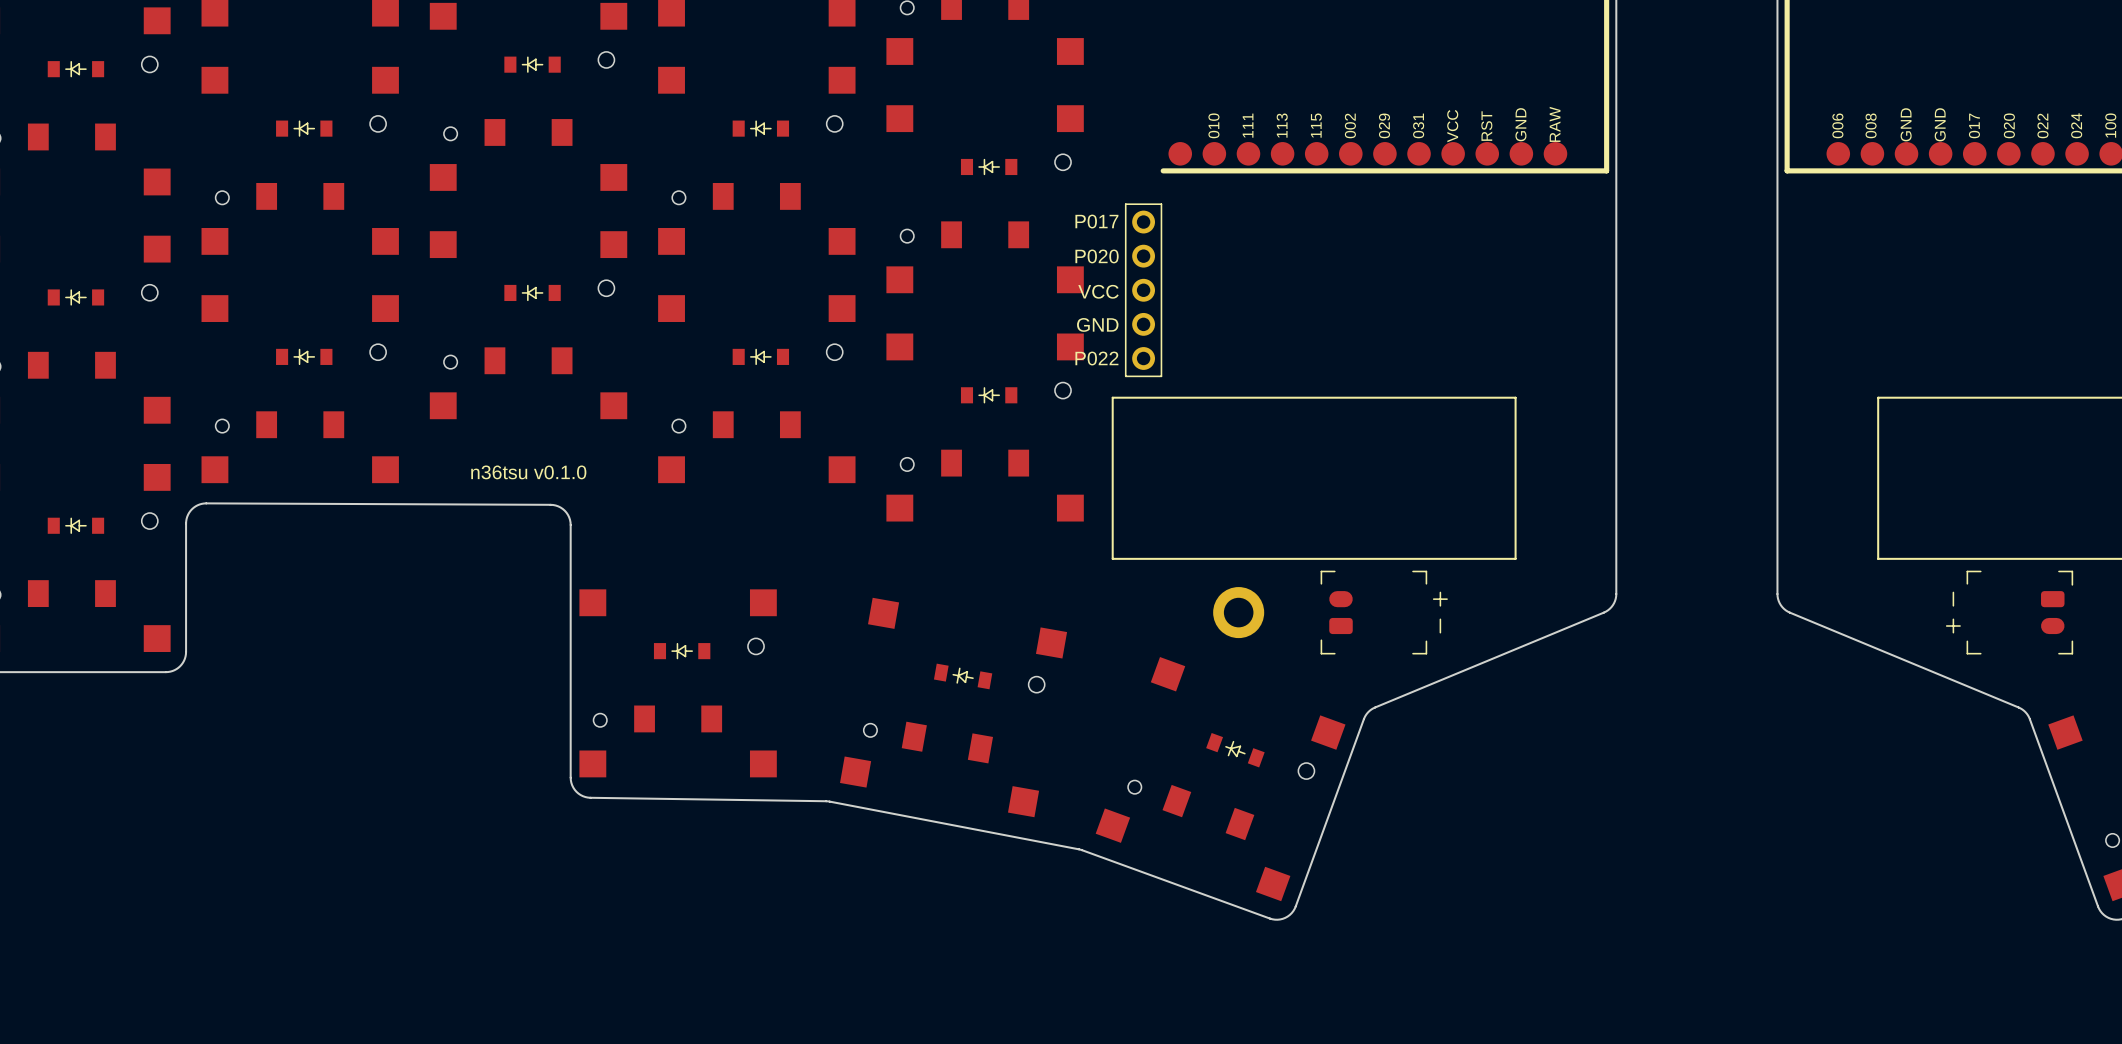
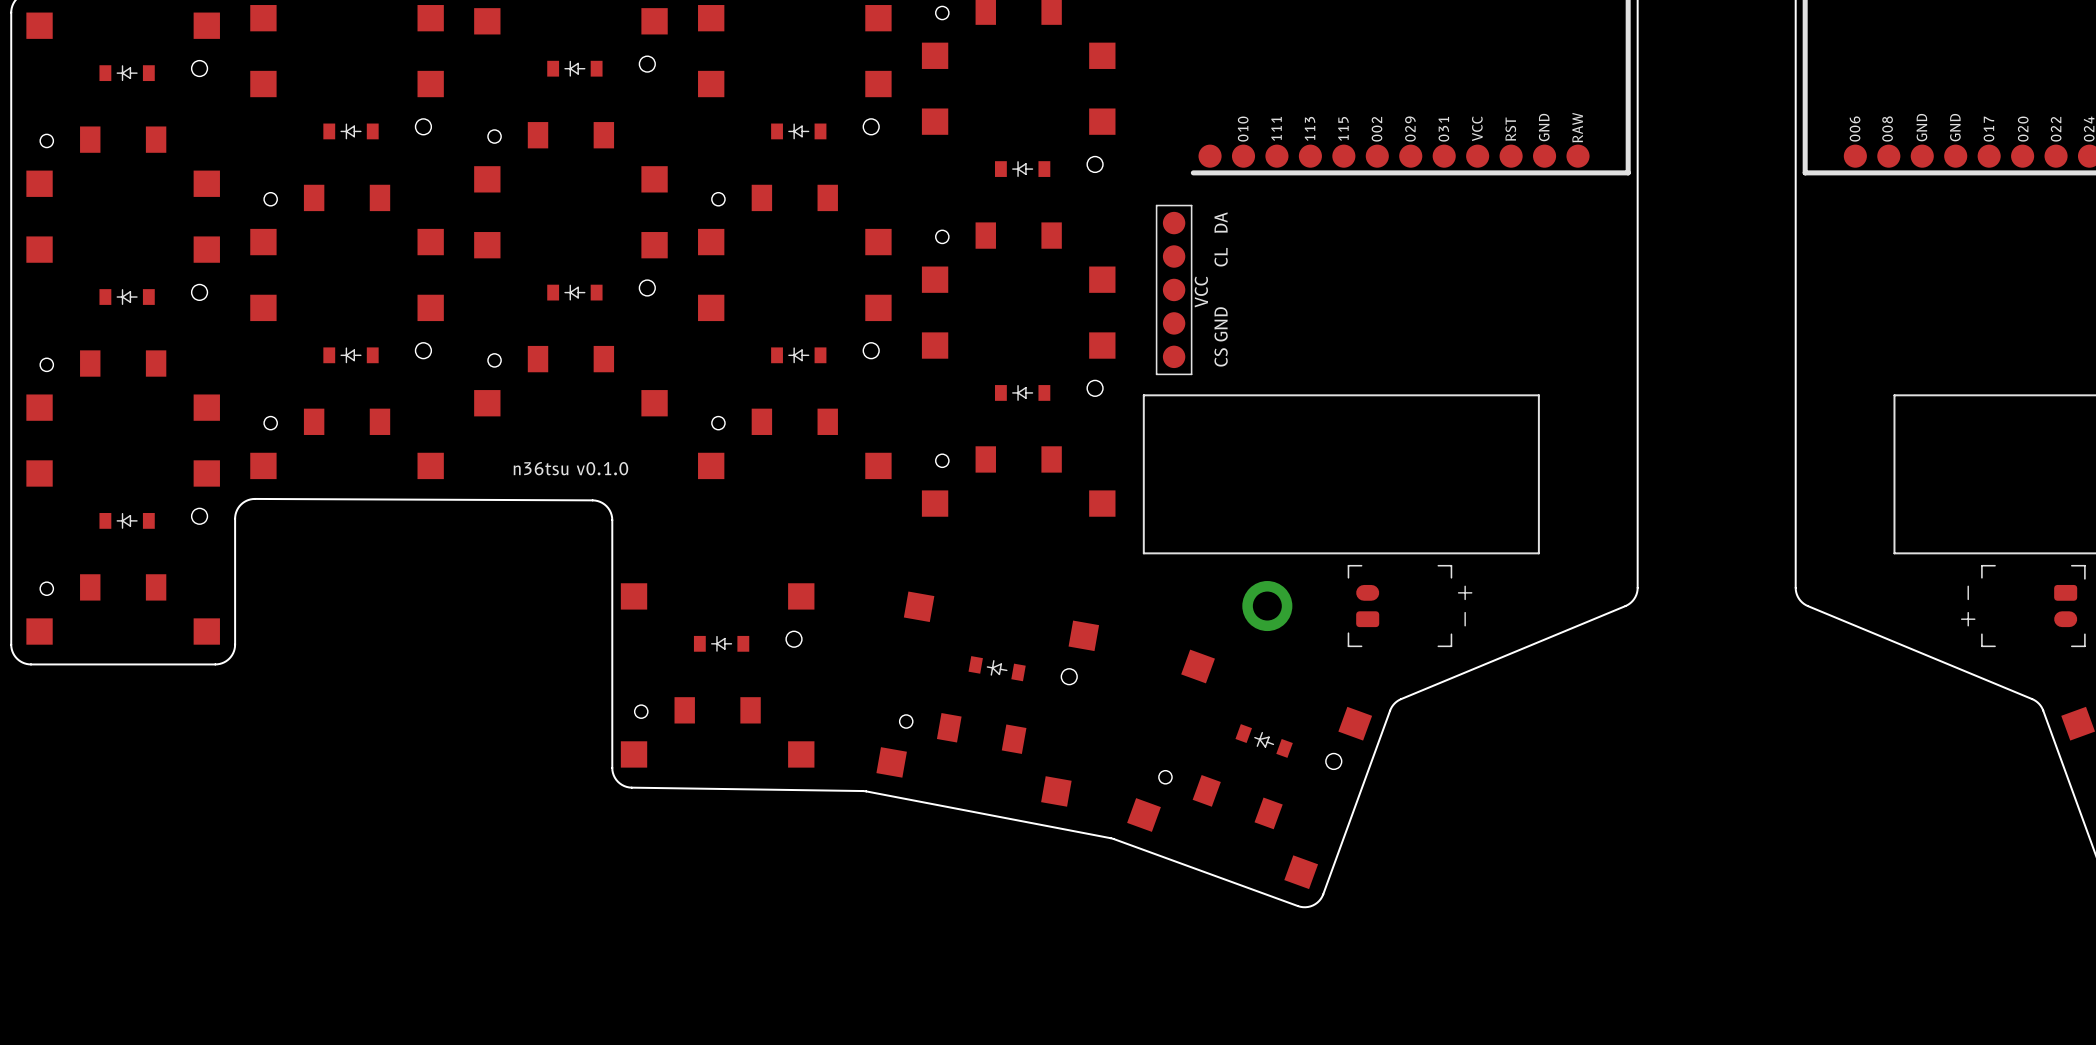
part footprint: [1124, 203, 1163, 378] -> [1155, 204, 1193, 376]

